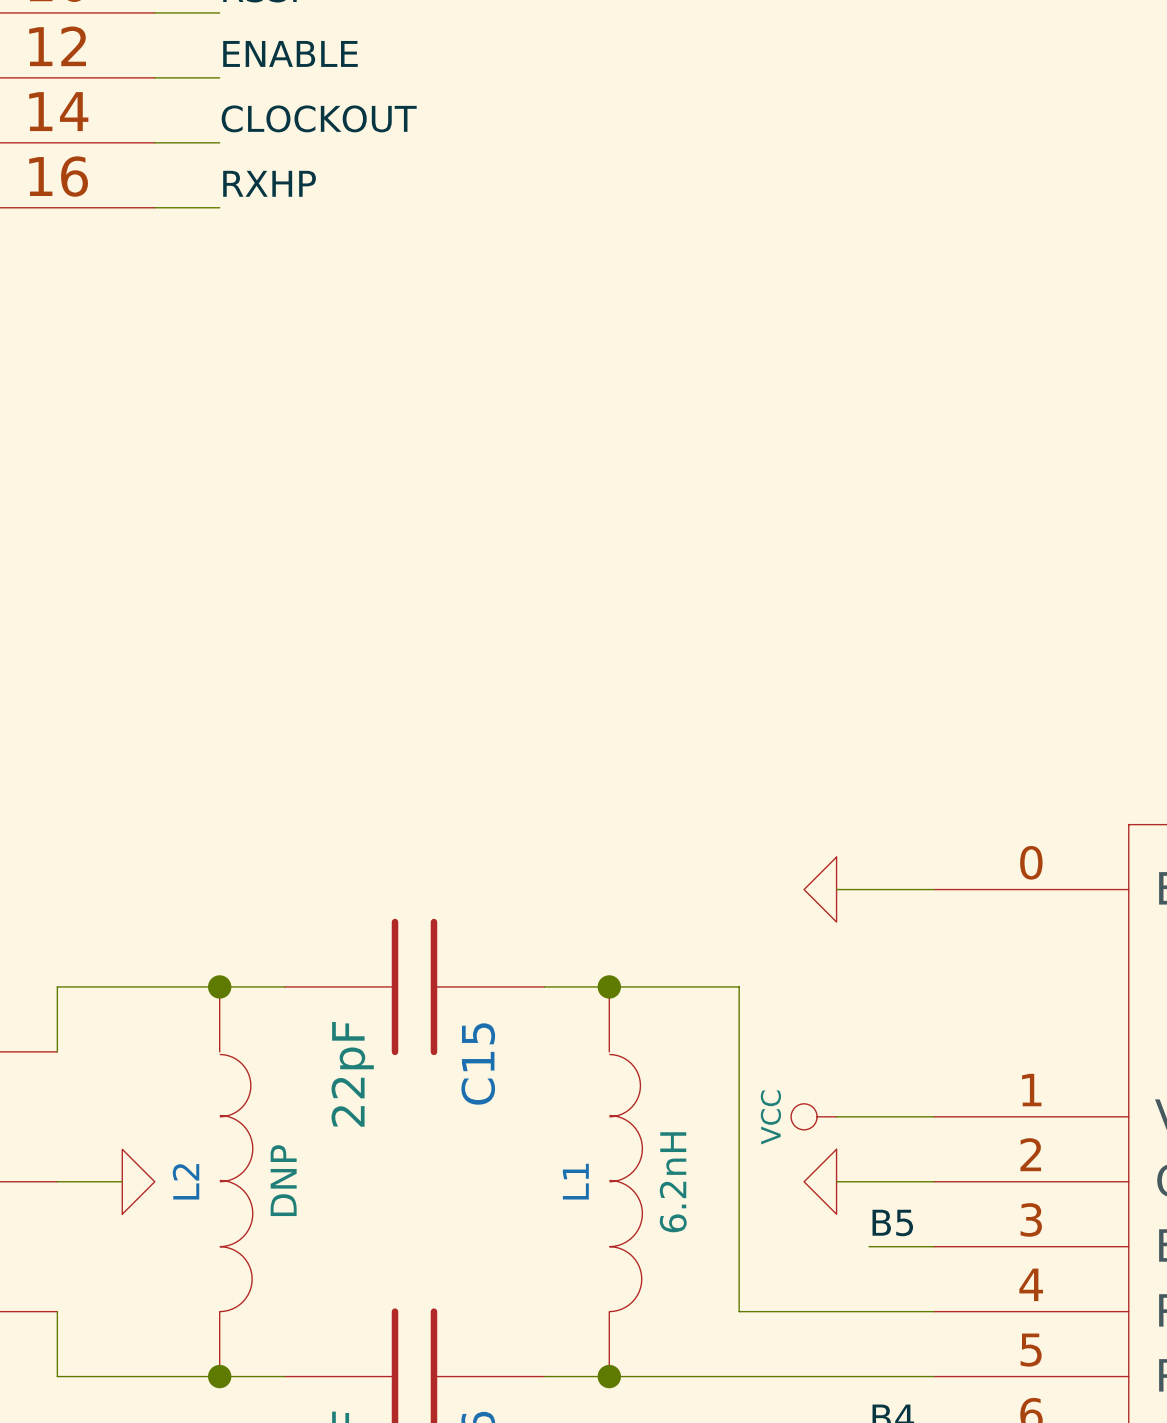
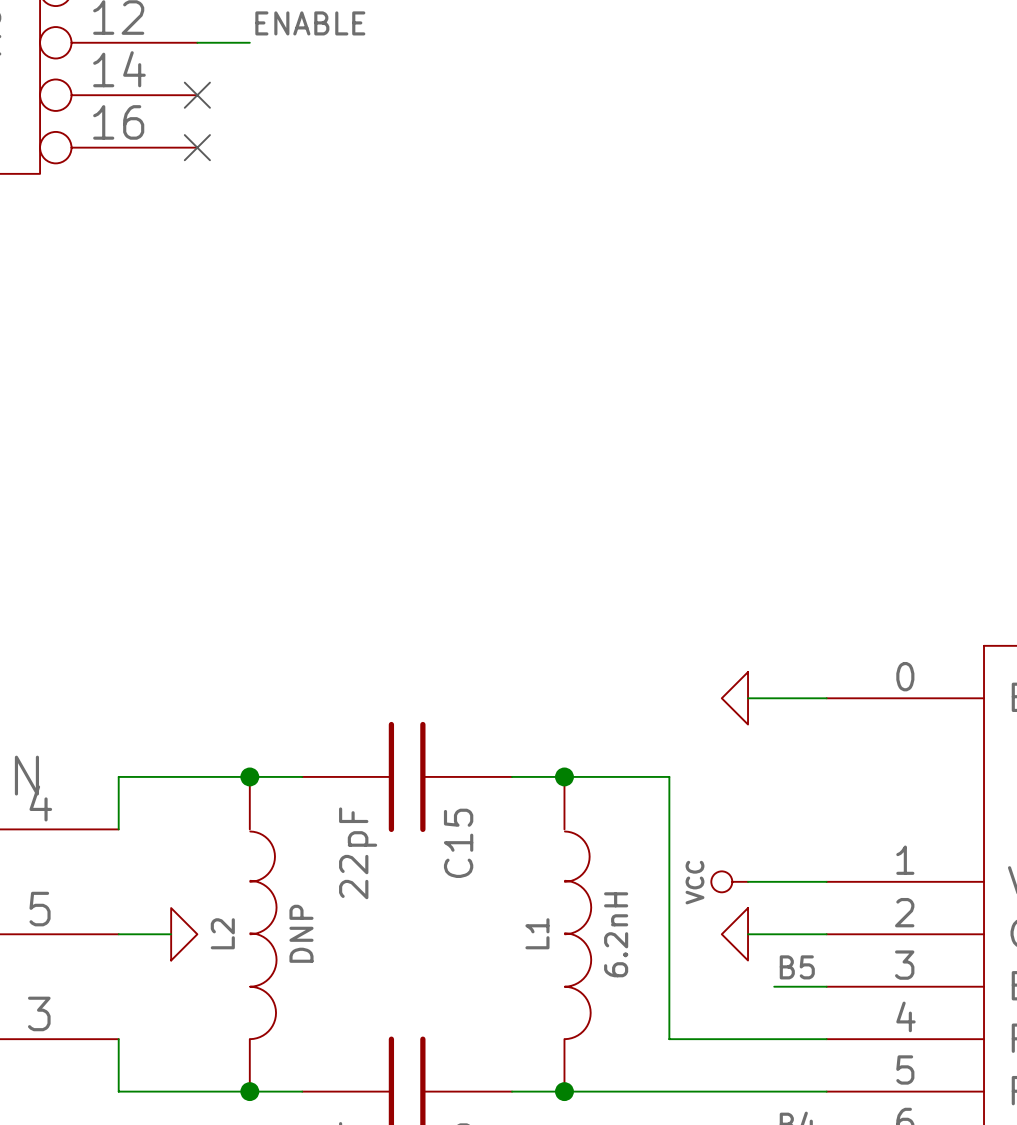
label: CLOCKOUT (319, 118) -> none
wire: (154, 142) (219, 142) -> none
no-connect mark: none -> (197, 95)
label: RXHP (269, 183) -> none
wire: (154, 207) (219, 207) -> none
no-connect mark: none -> (197, 147)

